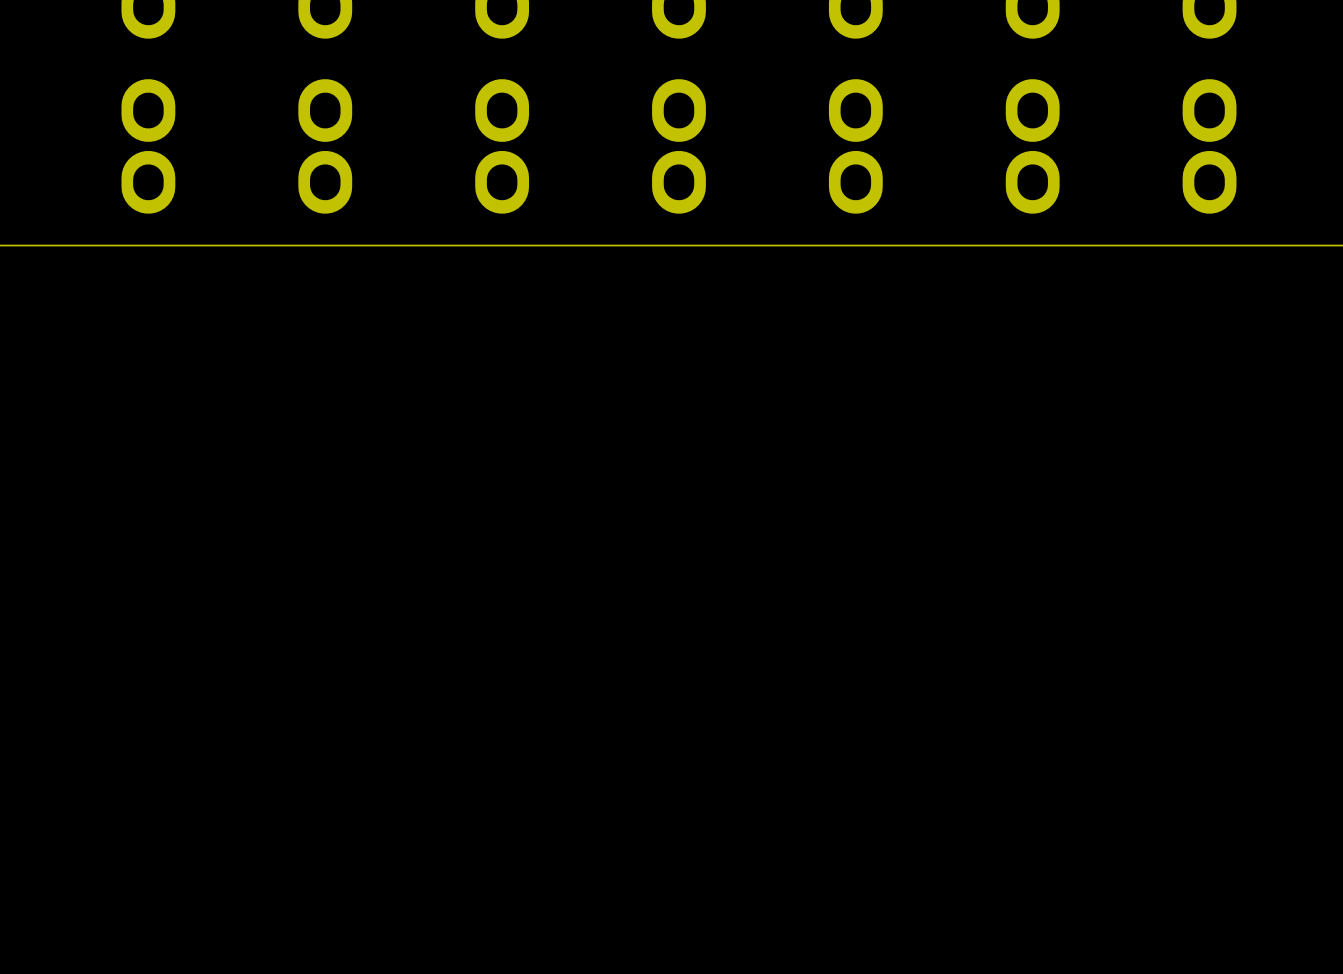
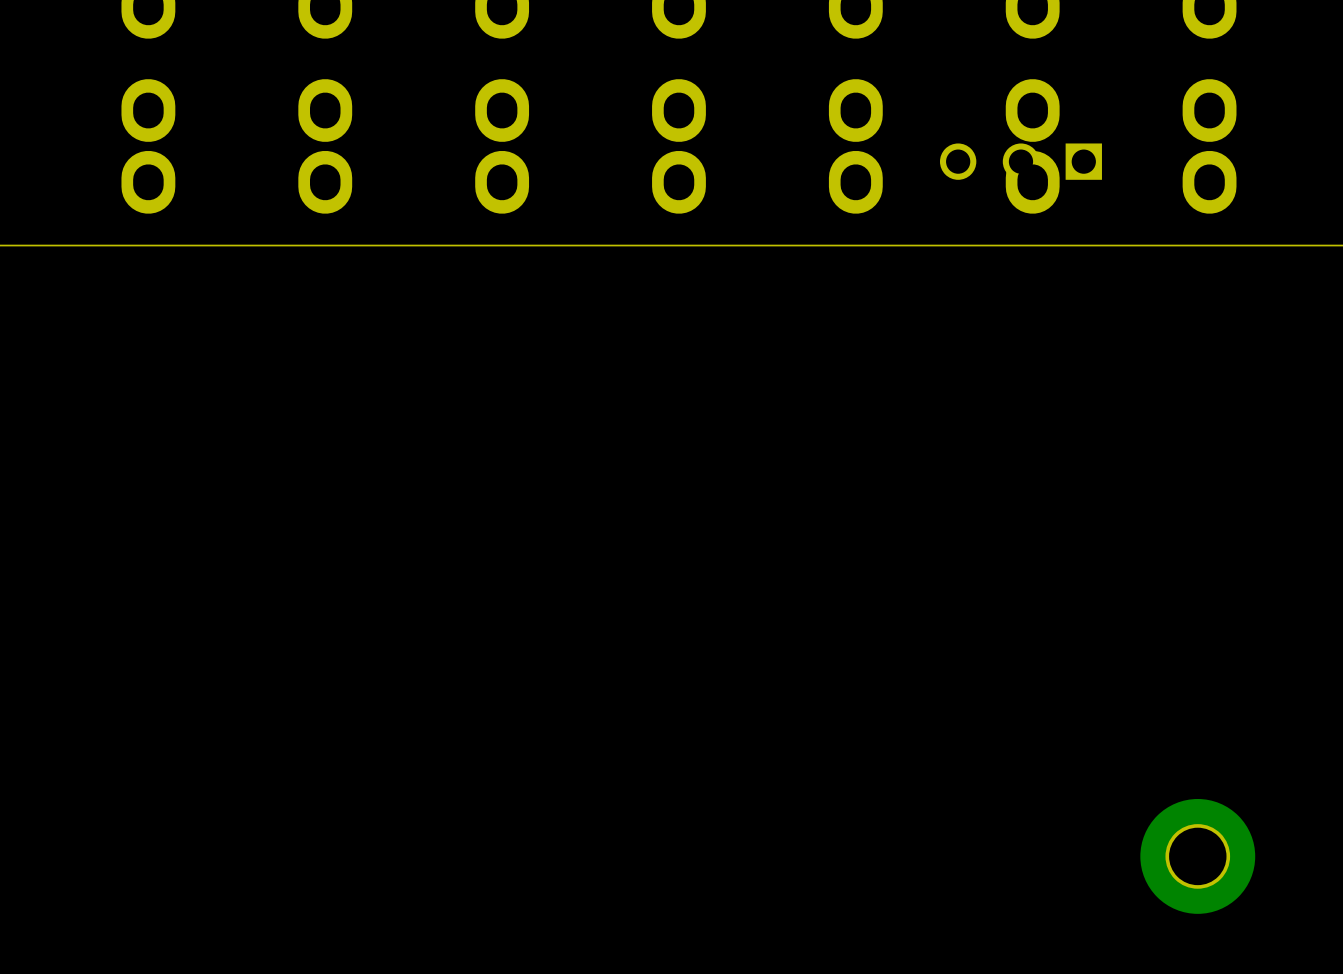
part: none -> (1020, 161)
part: none -> (1197, 856)

